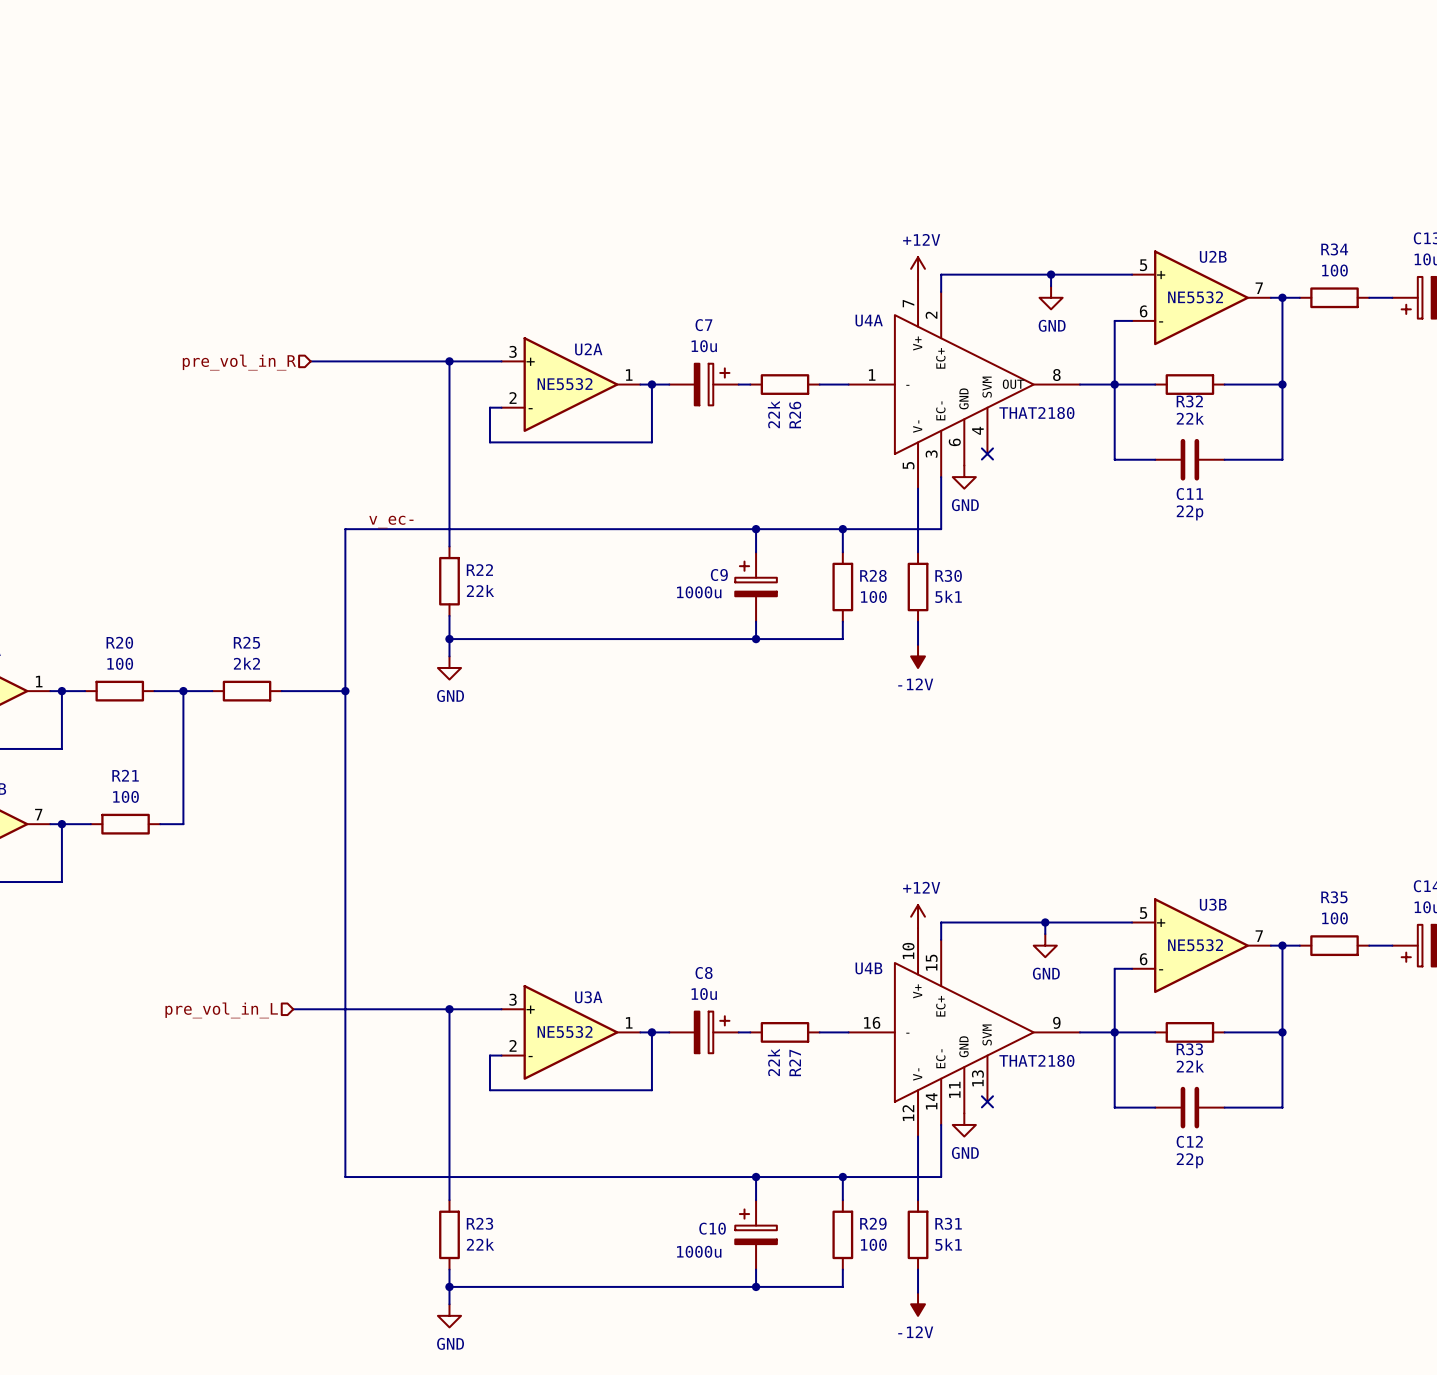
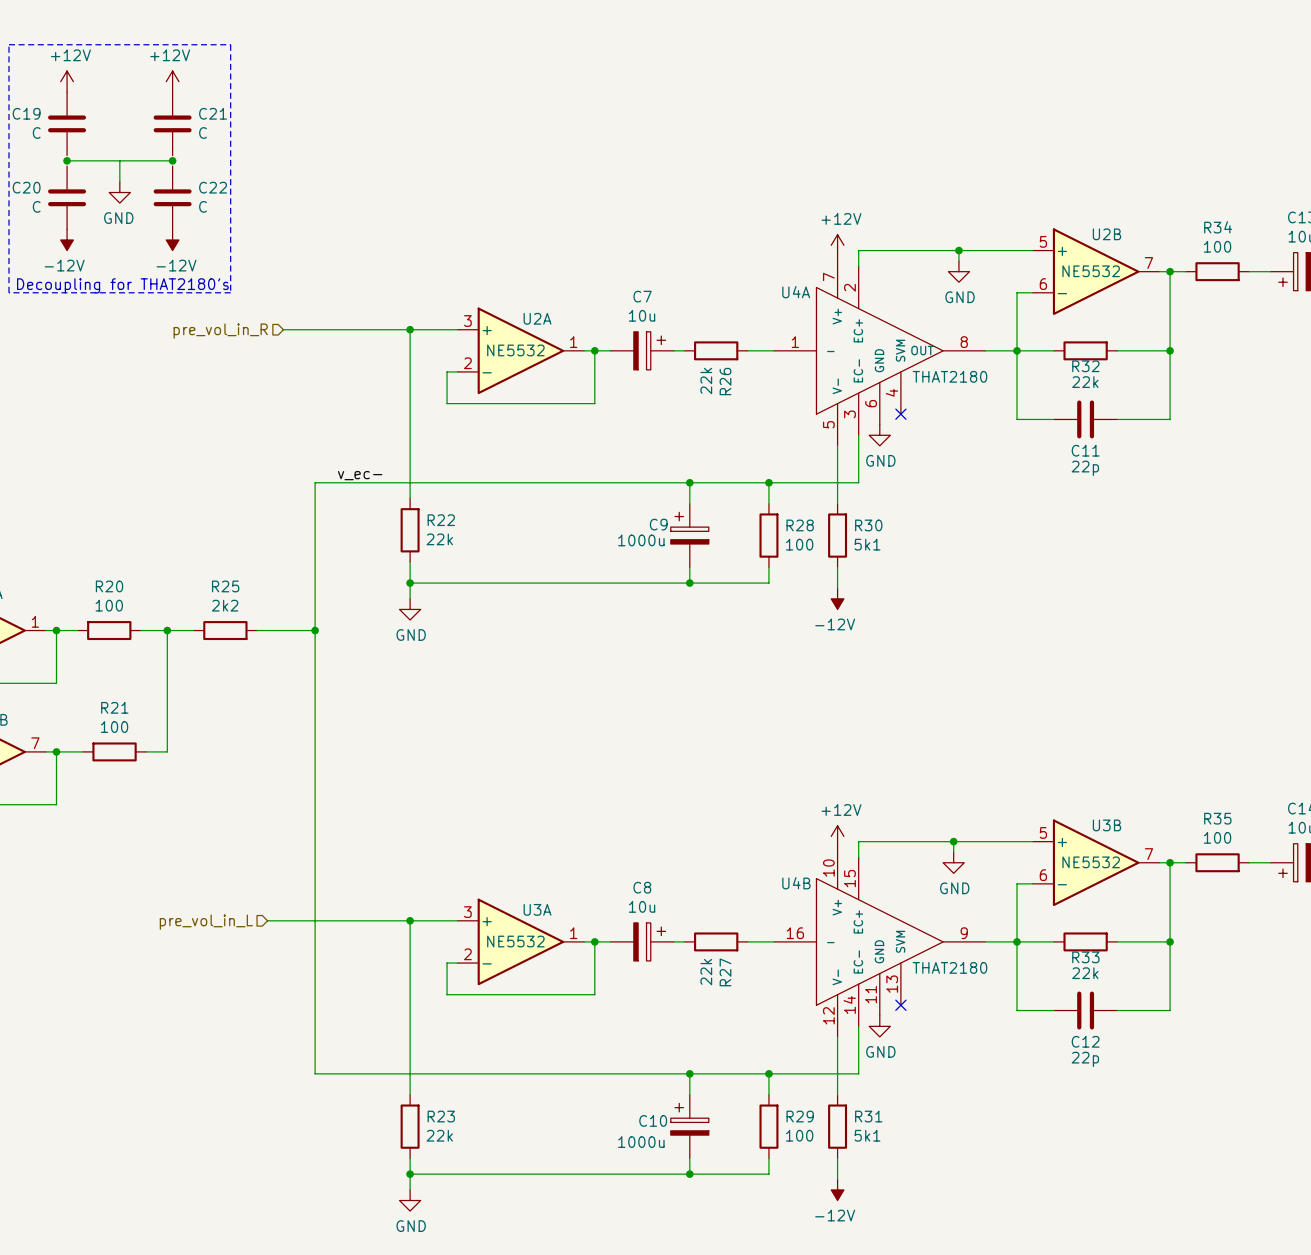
line: none -> (9, 44) (230, 44) (230, 292) (9, 292) (9, 44)
power symbol: none -> +12V (67, 81)
power symbol: none -> +12V (172, 81)
C19: none -> C (67, 123)
C21: none -> C (172, 123)
wire: none -> (67, 160) (172, 160)
junction: none -> (67, 160)
wire: none -> (119, 160) (119, 181)
junction: none -> (172, 160)
power symbol: none -> GND (119, 192)
C20: none -> C (67, 197)
C22: none -> C (172, 197)
power symbol: none -> -12V (67, 240)
power symbol: none -> -12V (172, 240)
text: none -> Decoupling for THAT2180's (122, 285)

